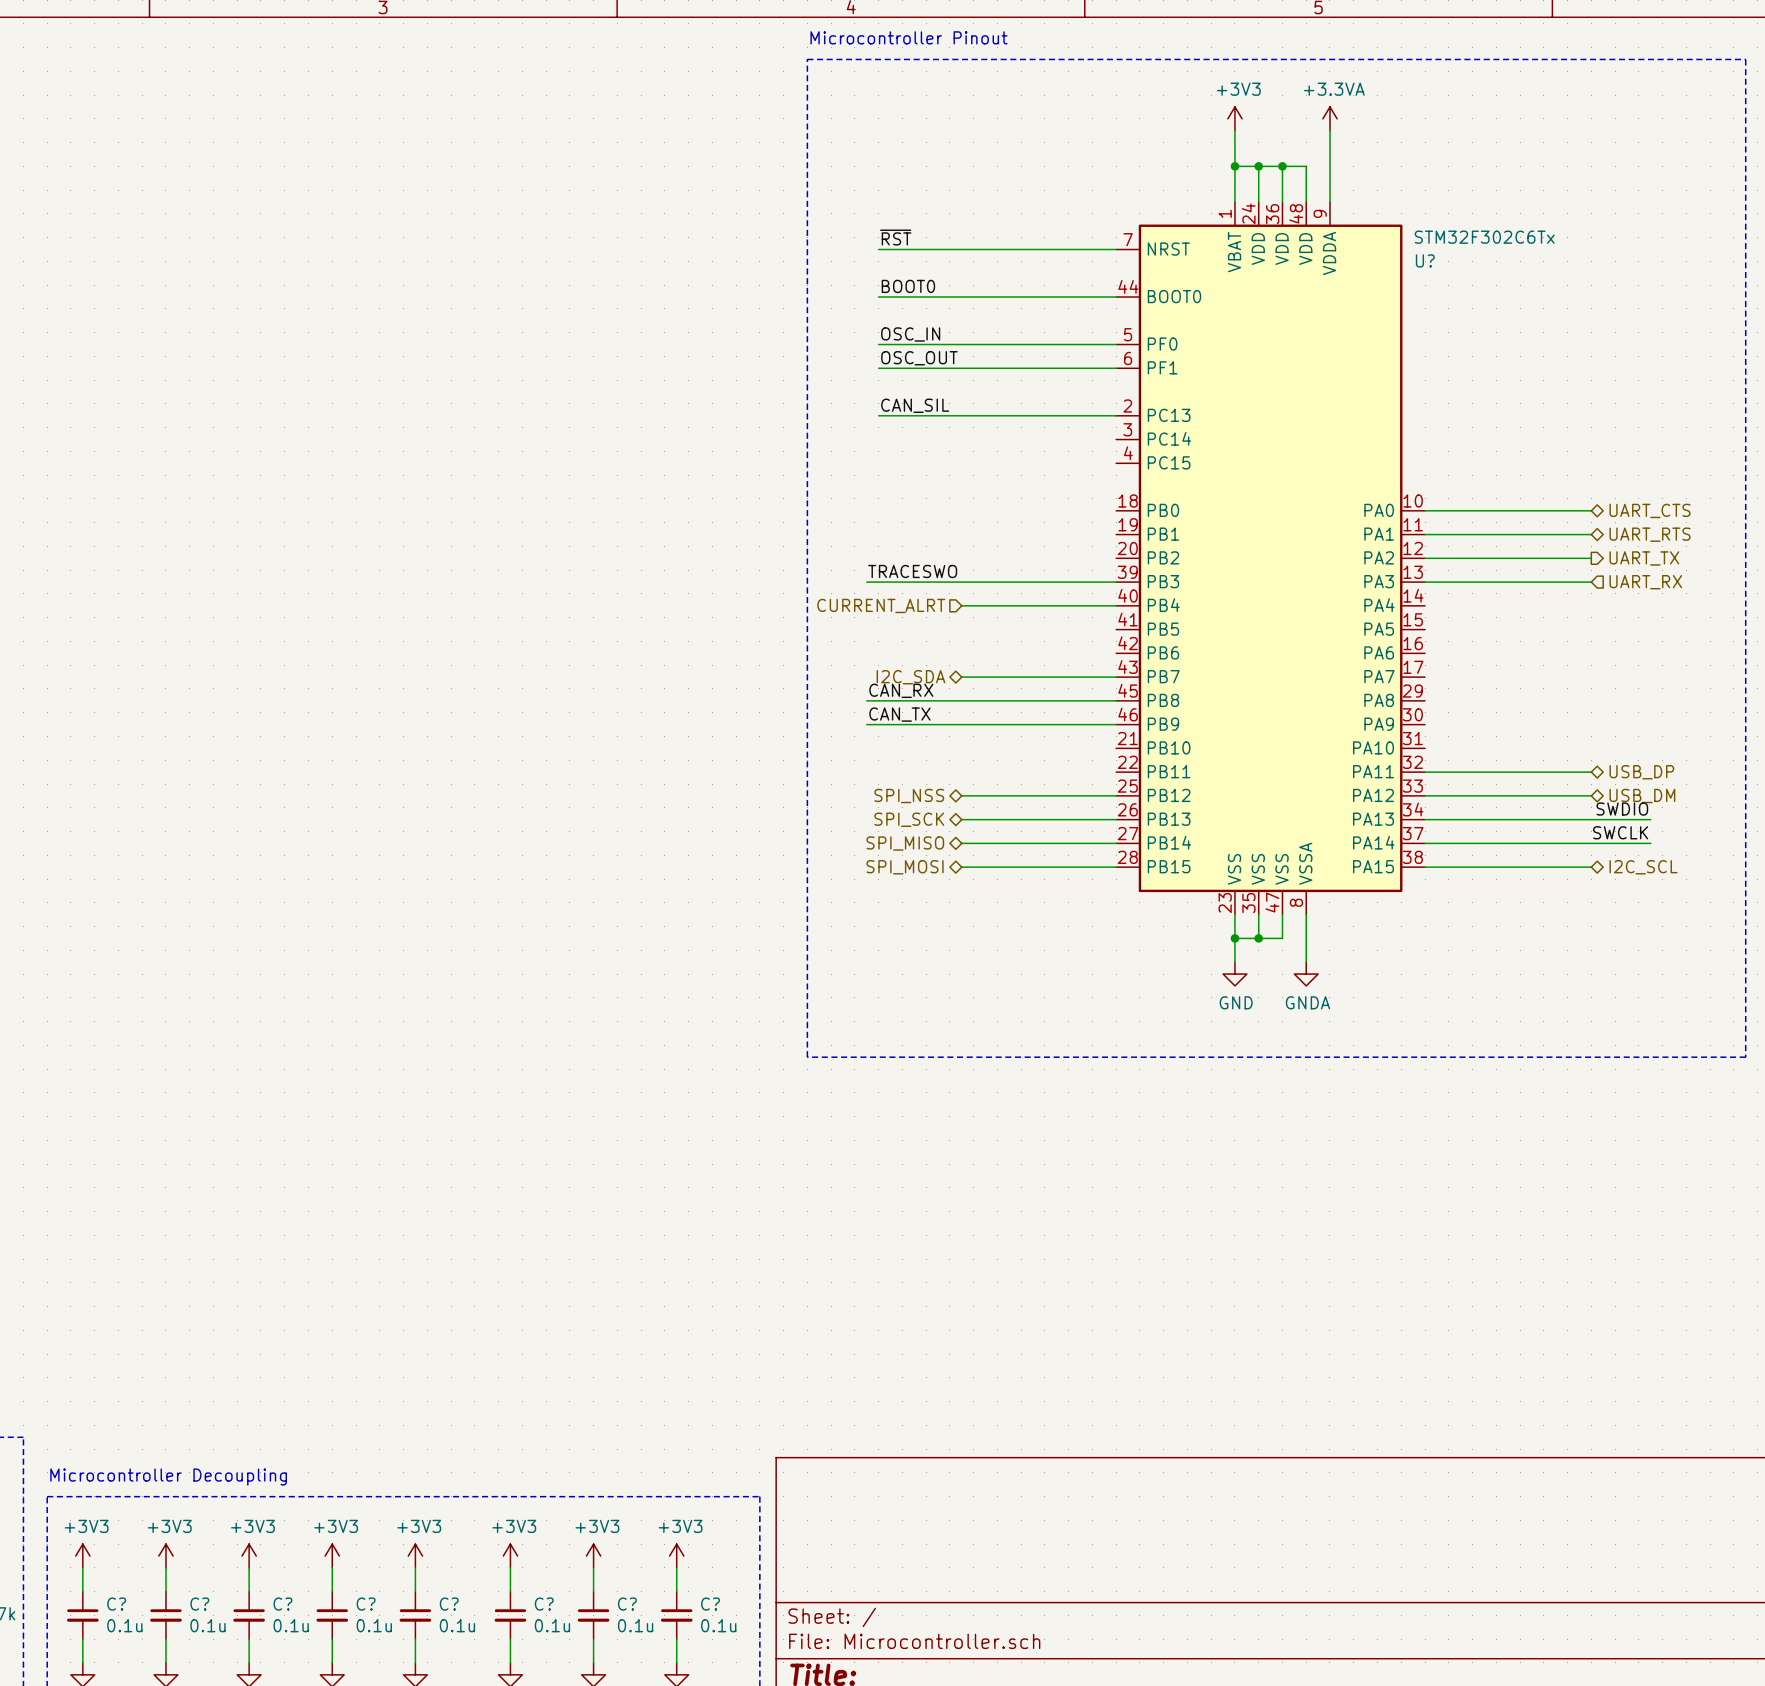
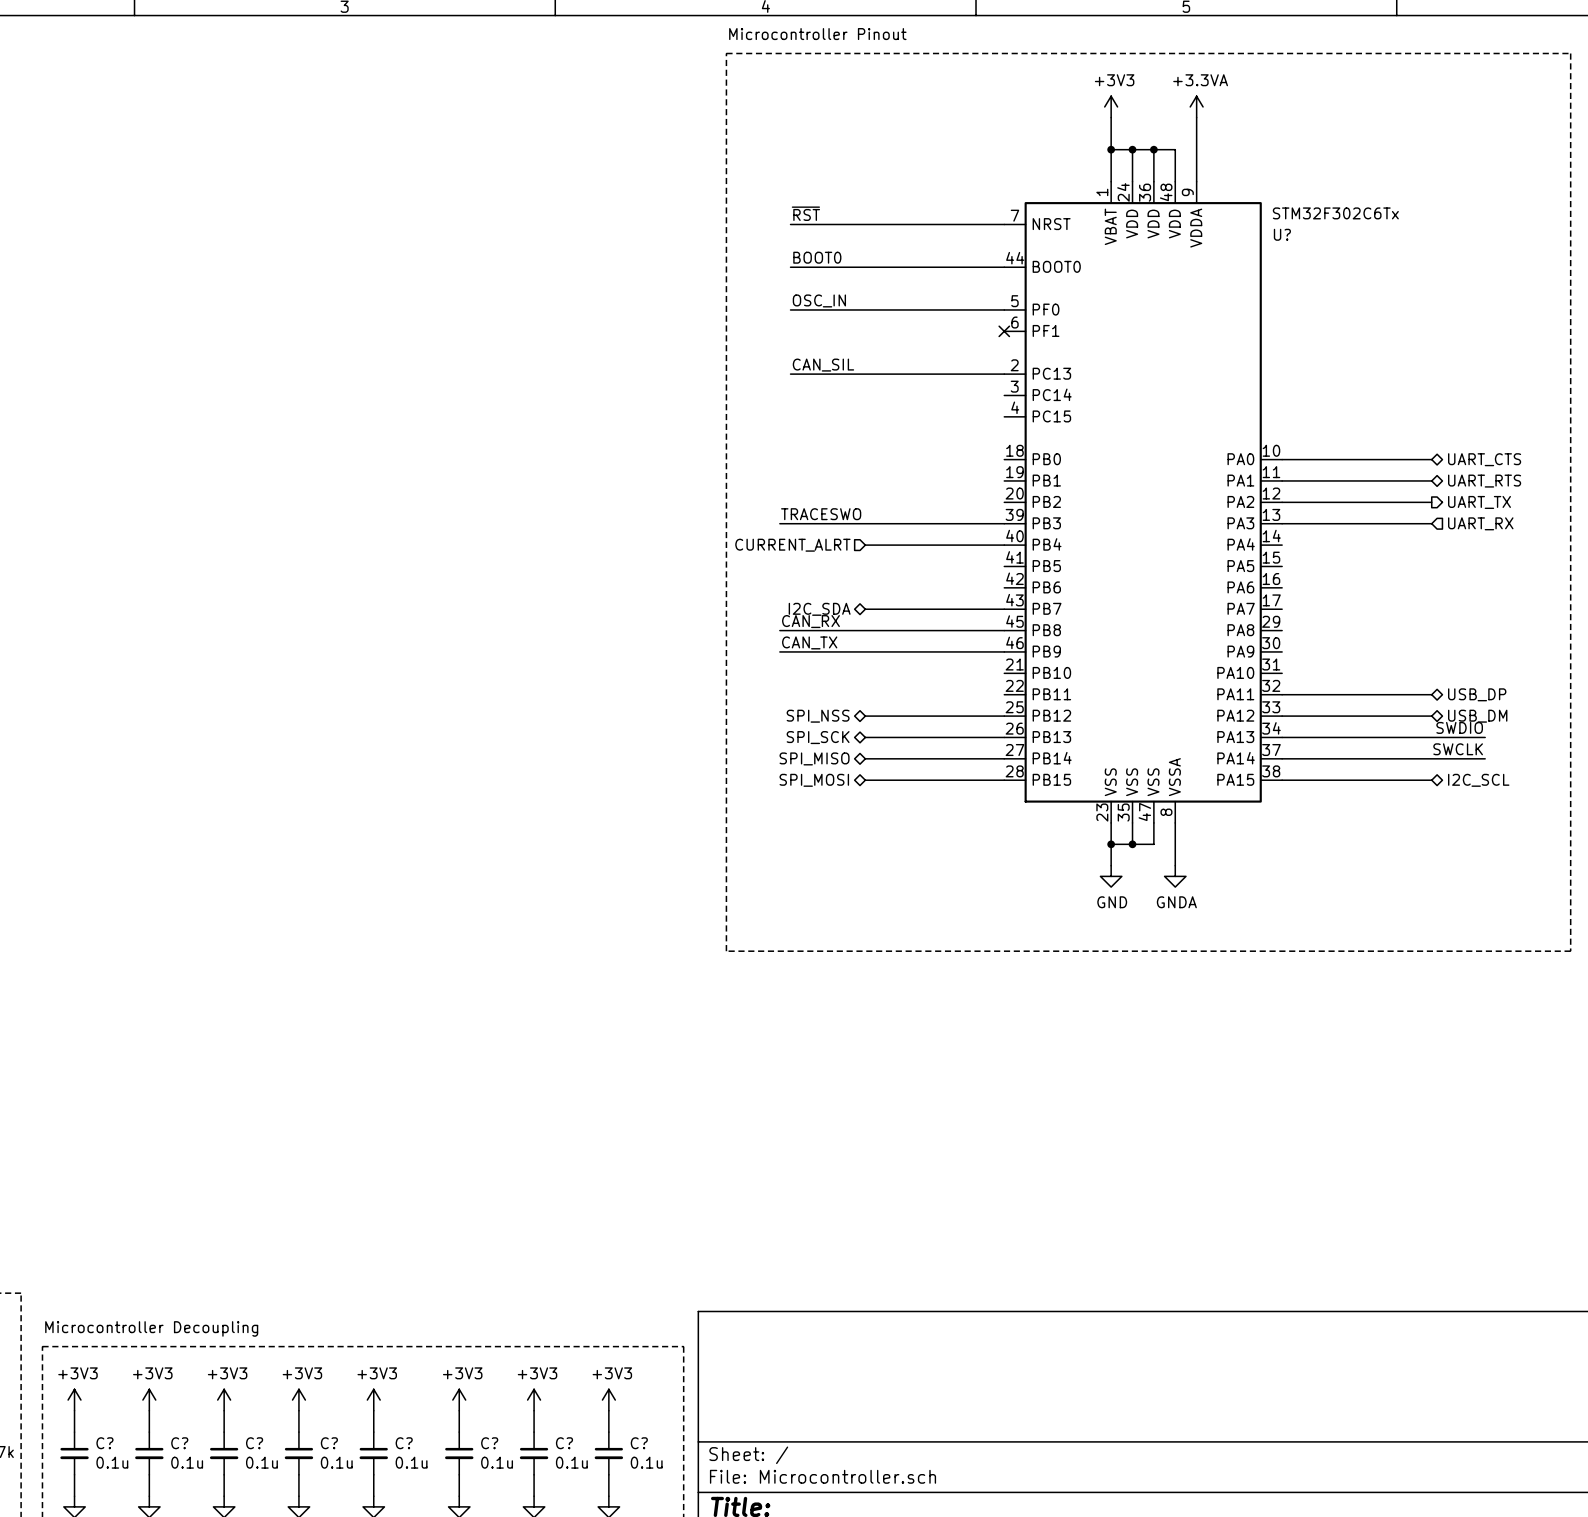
label: OSC_OUT (919, 358) -> none
wire: (878, 368) (1116, 368) -> none
no-connect mark: none -> (1004, 331)

